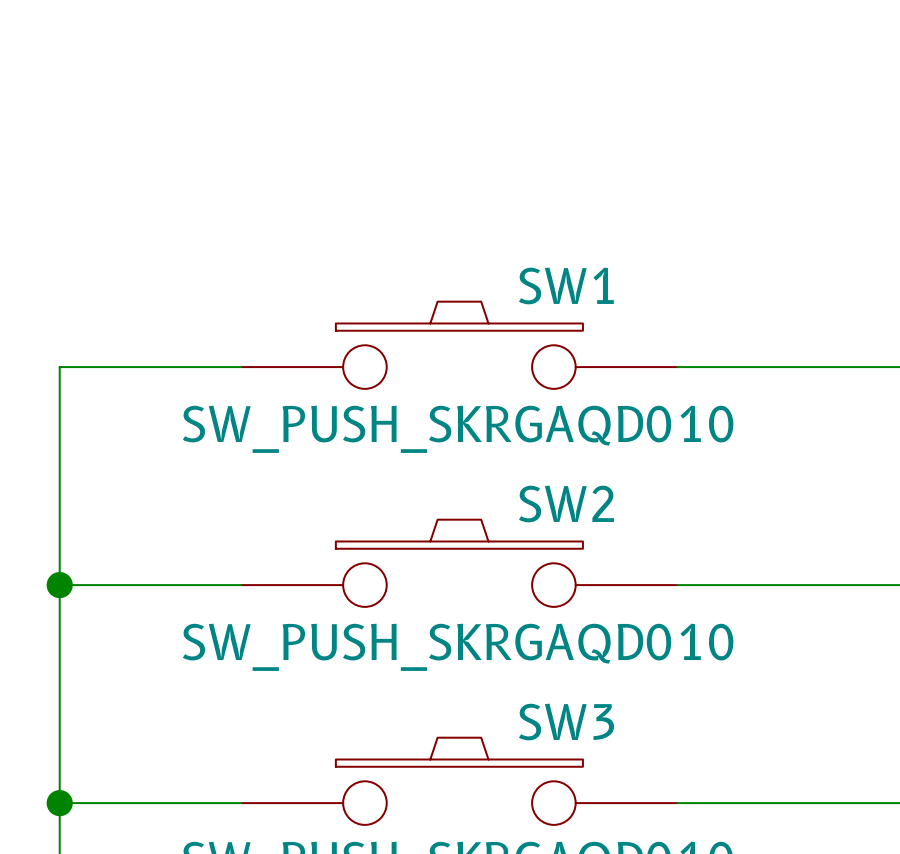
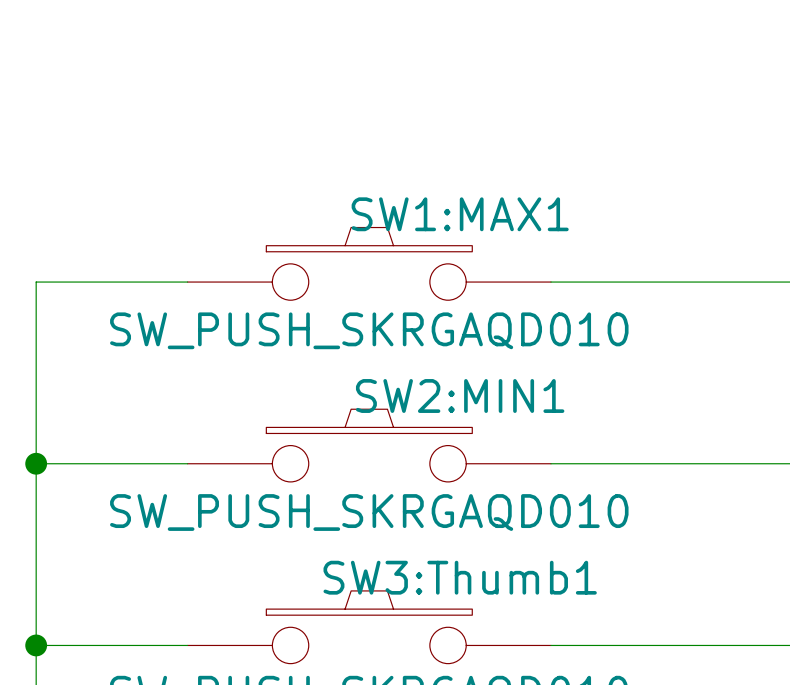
SW1 name: SW1 (566, 285) -> SW1:MAX1 (460, 214)
SW2 name: SW2 (566, 503) -> SW2:MIN1 (460, 395)
SW3 name: SW3 (566, 722) -> SW3:Thumb1 (460, 577)

